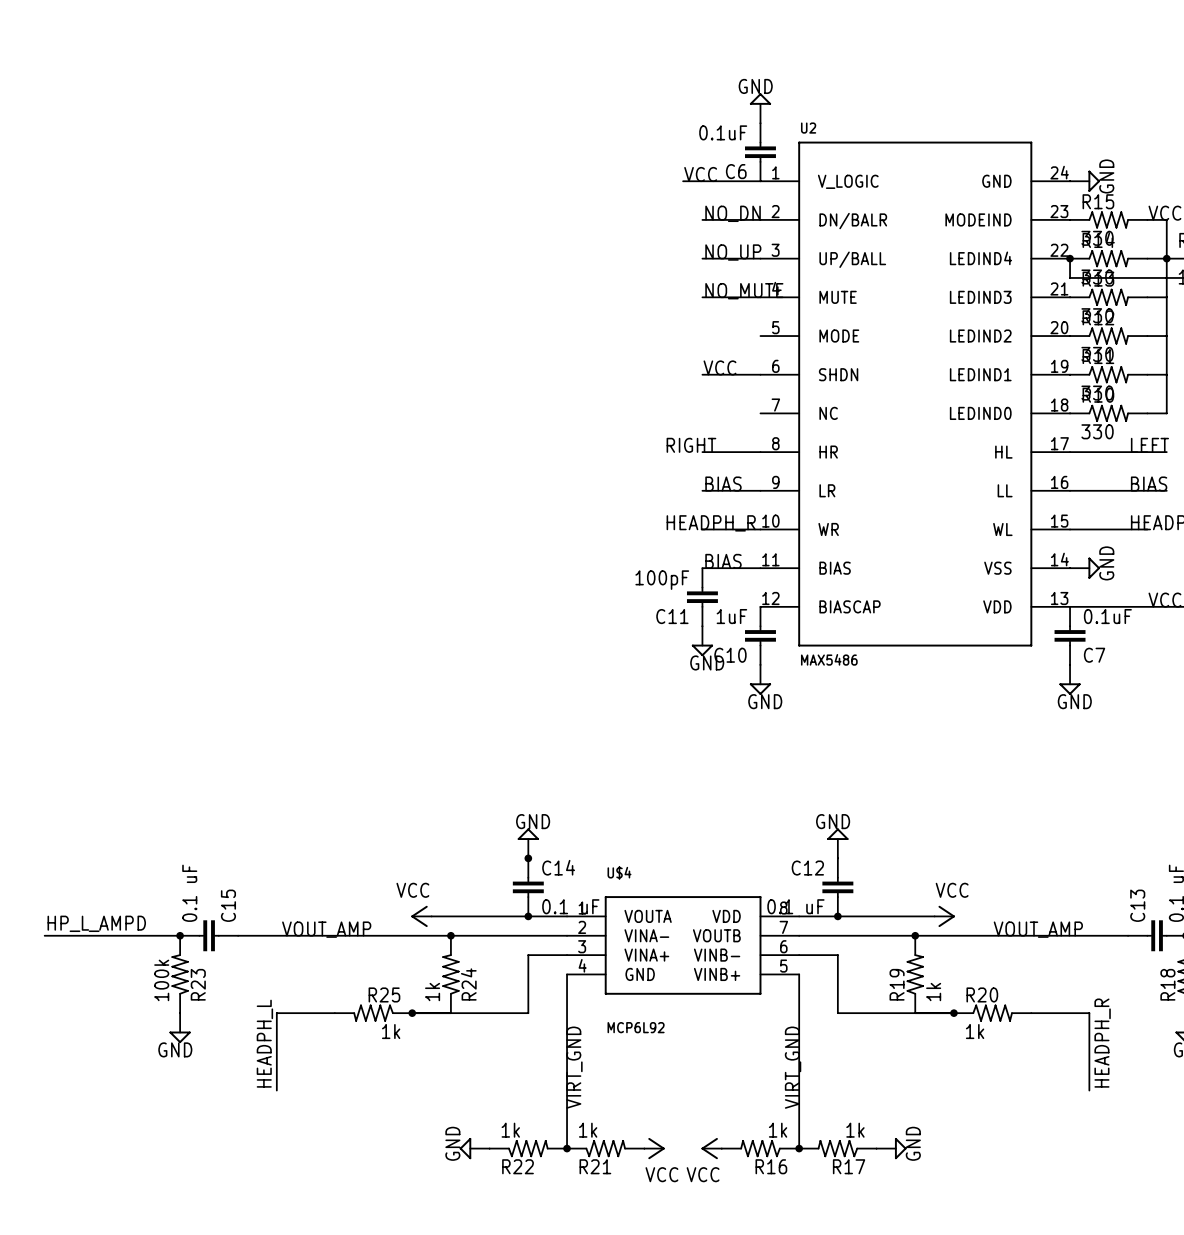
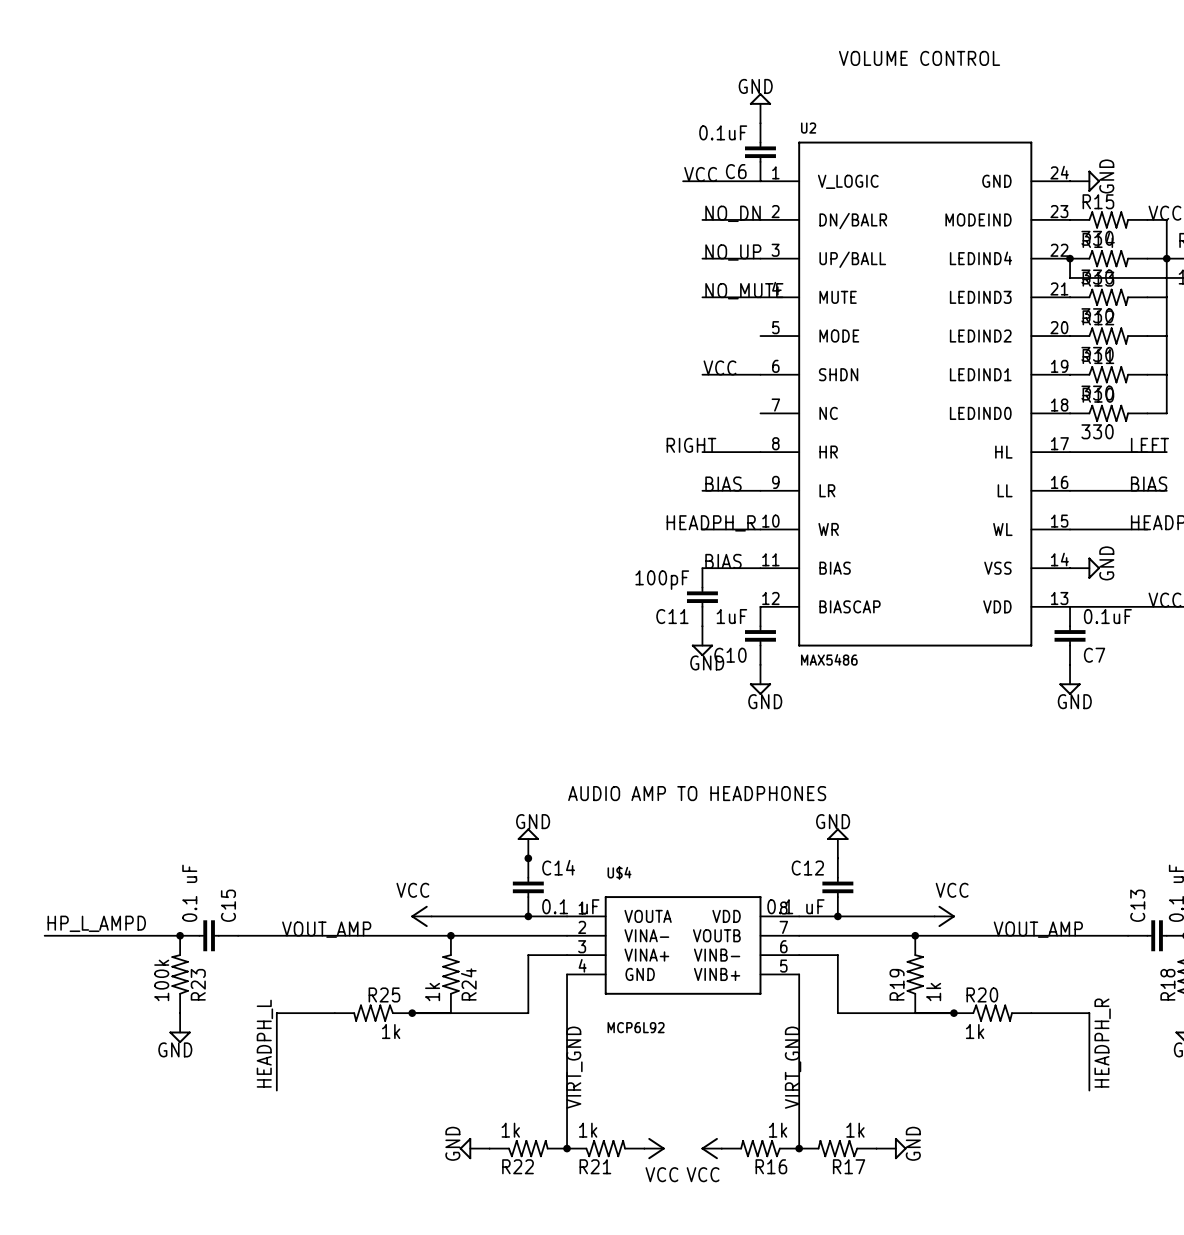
text: none -> VOLUME CONTROL (919, 58)
text: none -> AUDIO AMP TO HEADPHONES (697, 793)

